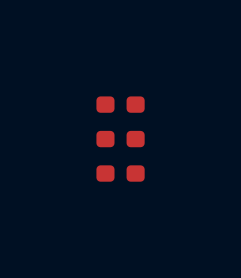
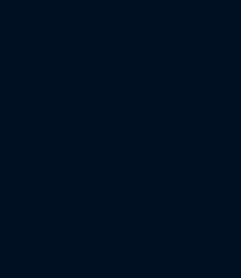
part: (120, 104) -> none
part: (120, 139) -> none
part: (120, 173) -> none

